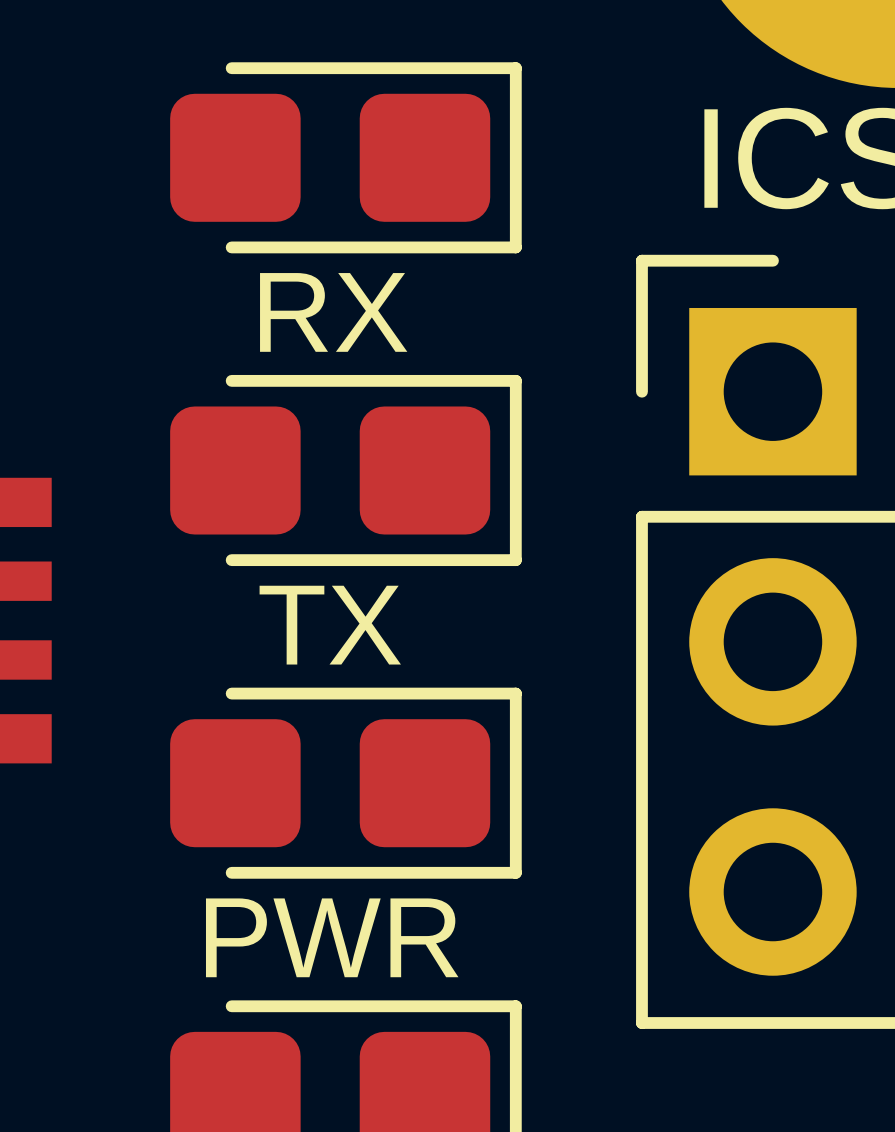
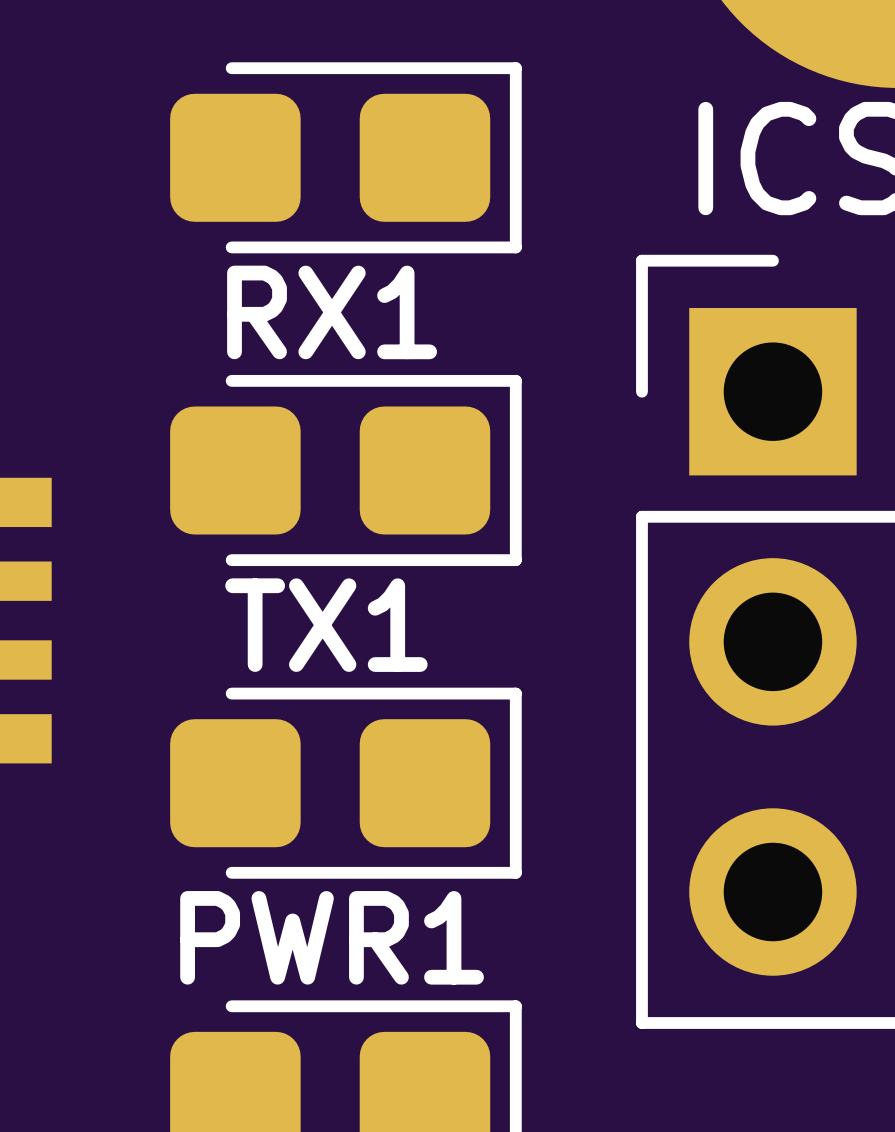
RX name: RX (333, 312) -> RX1 (332, 312)
TX name: TX (330, 625) -> TX1 (326, 625)
PWR name: PWR (332, 937) -> PWR1 (332, 937)

